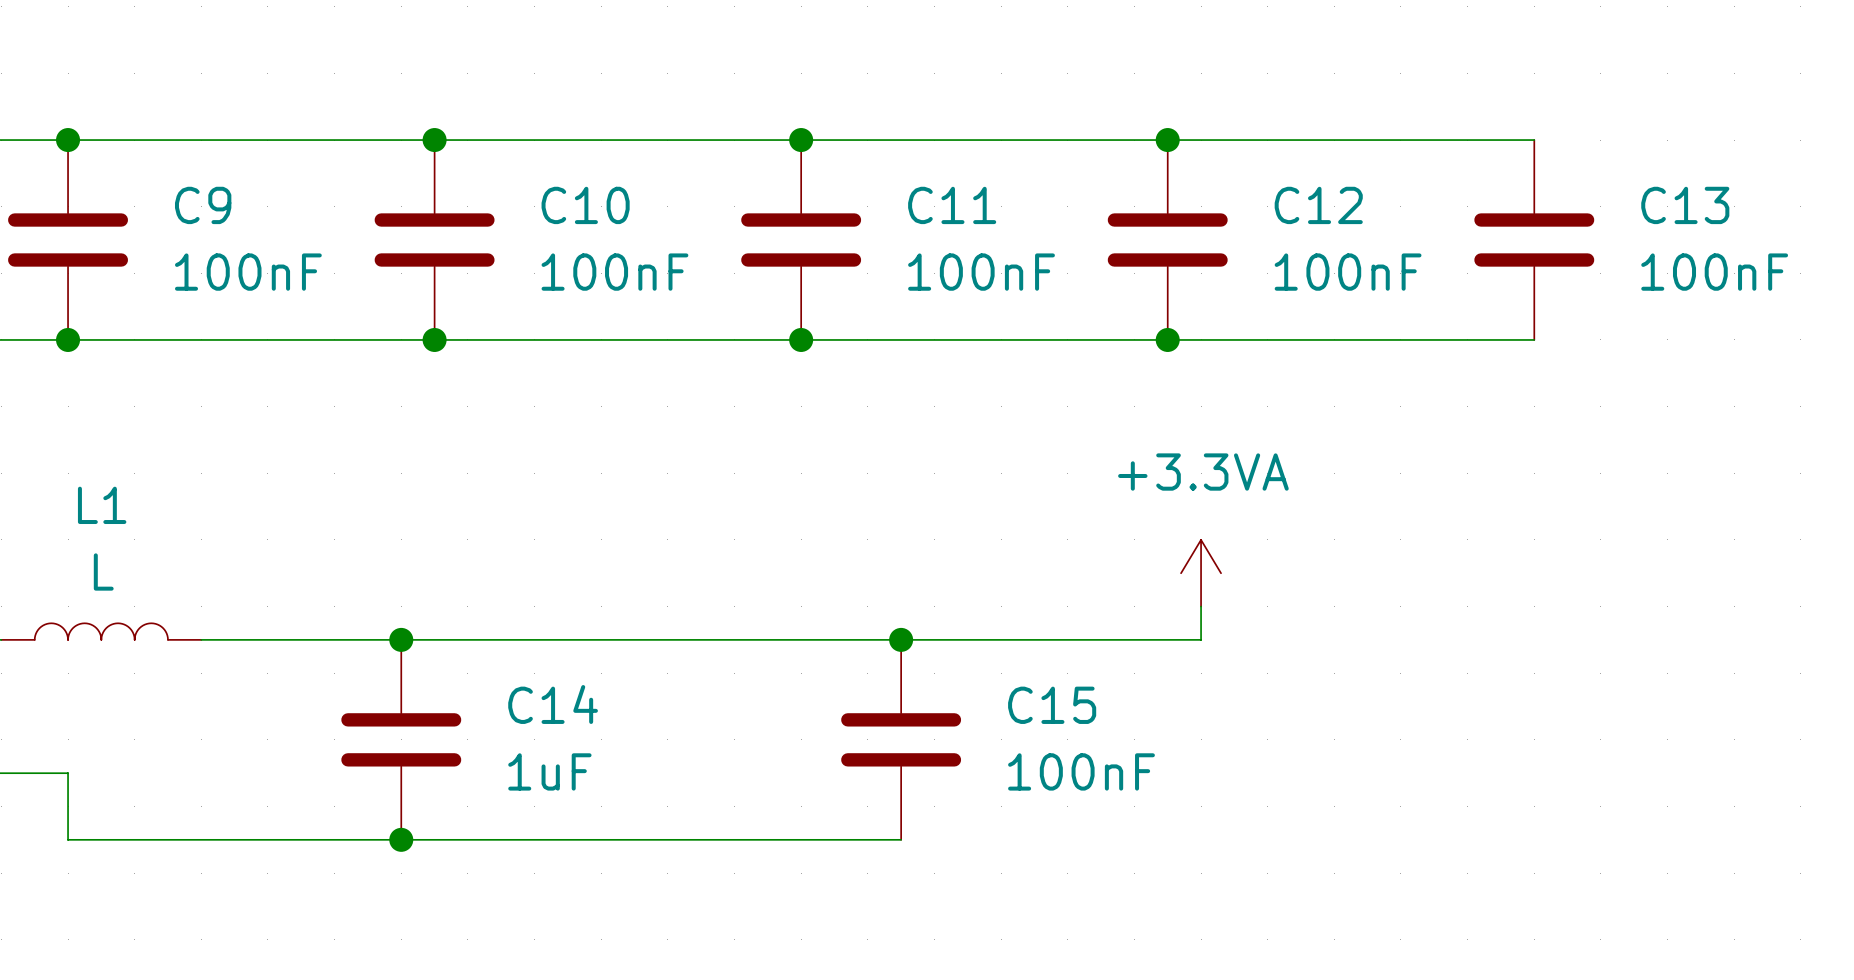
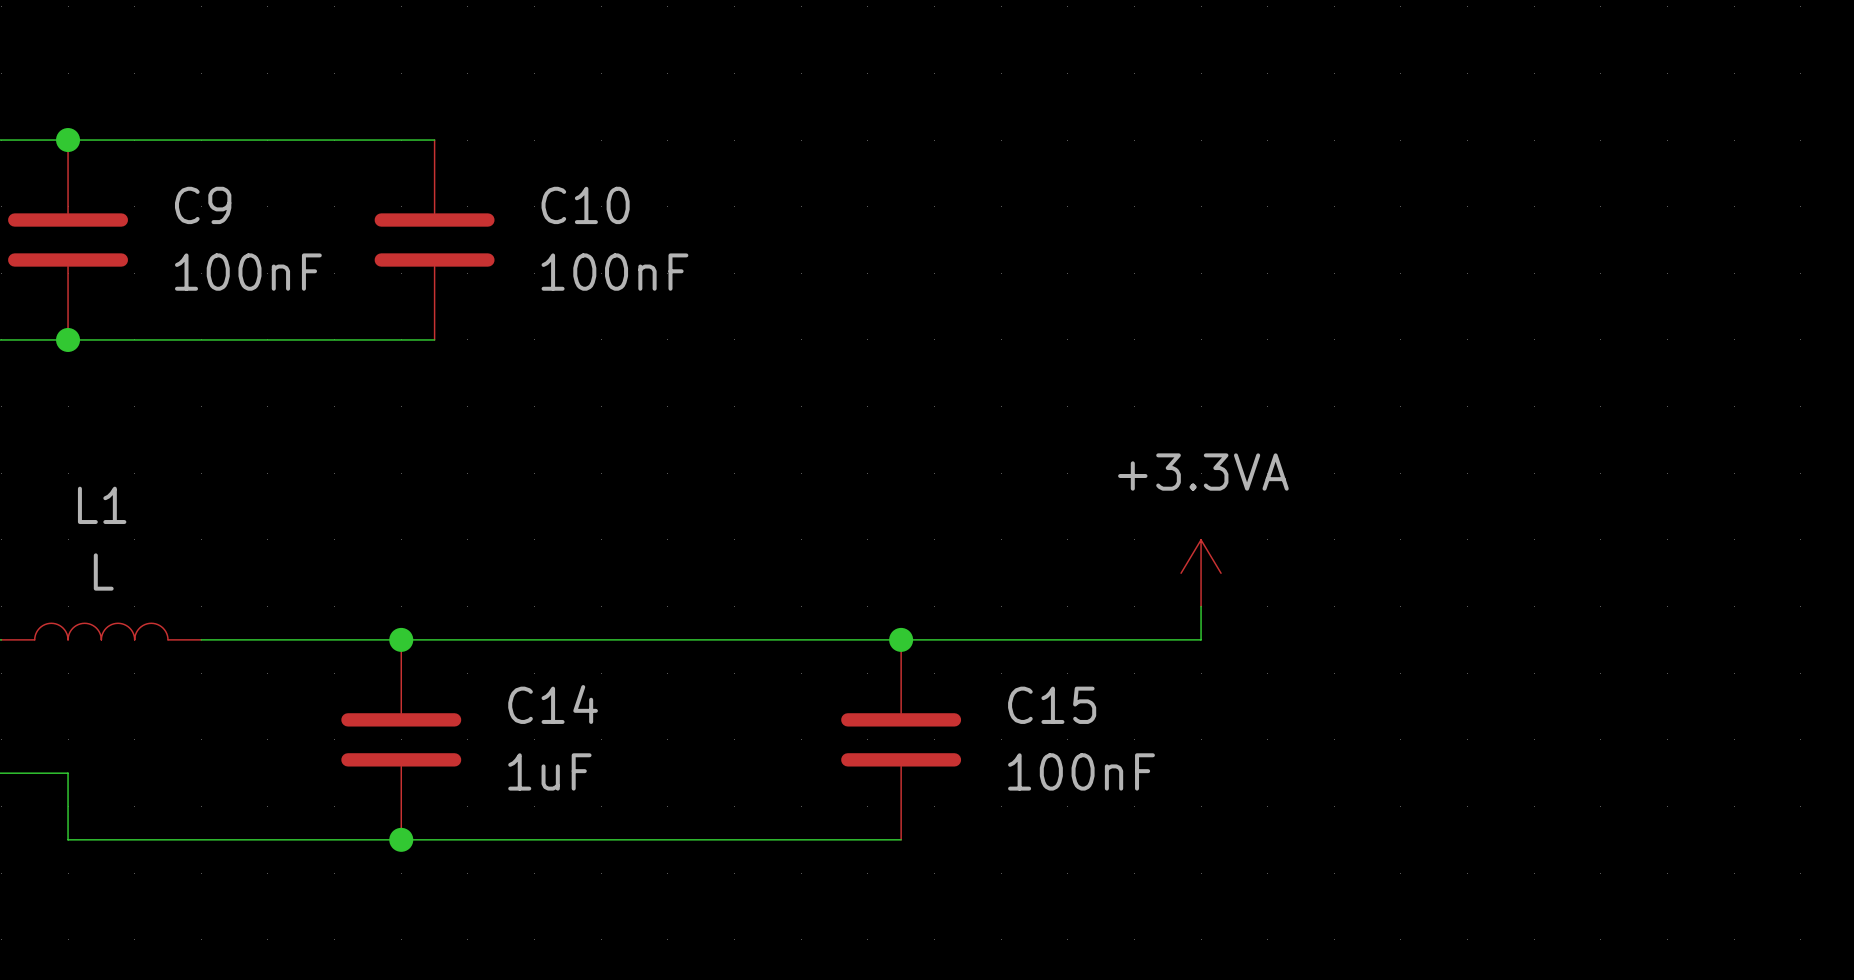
wire: (434, 140) (1534, 140) -> none
junction: (434, 140) -> none
junction: (801, 140) -> none
junction: (1167, 140) -> none
C11: 100nF (801, 240) -> none
C12: 100nF (1167, 240) -> none
C13: 100nF (1534, 240) -> none
wire: (434, 339) (1534, 339) -> none
junction: (434, 339) -> none
junction: (801, 339) -> none
junction: (1167, 339) -> none

